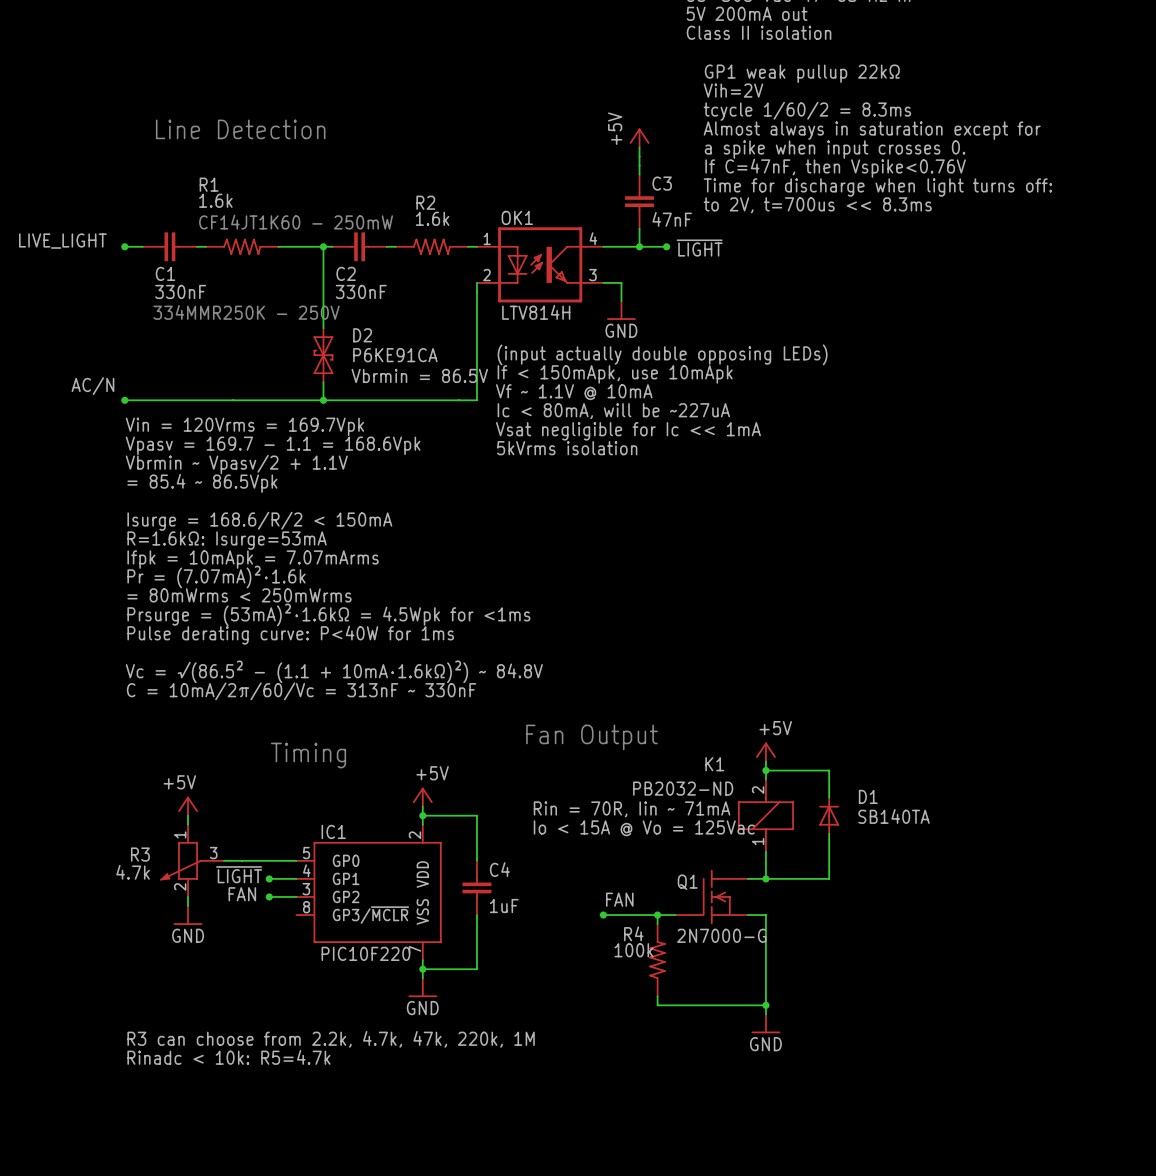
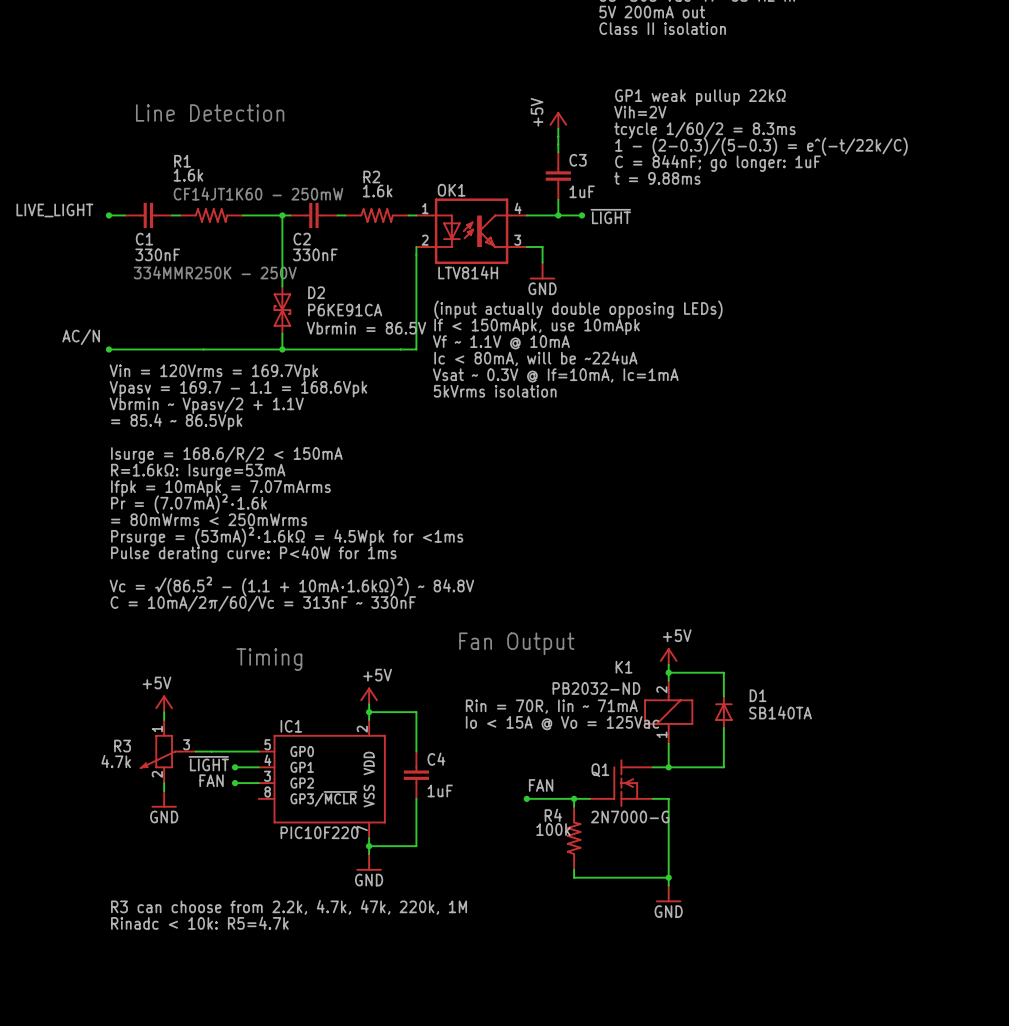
text: GP1 weak pullup 22kΩ (802, 73) -> none
text: Vih=2V (733, 90) -> none
text: tcycle 1/60/2 = 8.3ms (807, 111) -> GP1 weak pullup 22kΩ (700, 97)
text: Almost always in saturation except for (872, 130) -> Vih=2V (640, 112)
text: a spike when input crosses 0. (835, 149) -> tcycle 1/60/2 = 8.3ms (704, 130)
text: If C=47nF, then Vspike<0.76V (835, 168) -> 1 - (2-0.3)/(5-0.3) = e^(-t/22k/C) (761, 146)
text: Time for discharge when light turns off: (877, 187) -> C = 844nF; go longer: 1uF (717, 163)
text: to 2V, t=700us << 8.3ms (817, 205) -> t = 9.88ms (657, 178)
C3 value: 47nF (672, 219) -> 1uF (582, 191)
text: Ic < 80mA, will be ~227uA (613, 411) -> Ic < 80mA, will be ~224uA (535, 358)
text: Vsat negligible for Ic << 1mA (628, 431) -> Vsat ~ 0.3V @ If=10mA, Ic=1mA (555, 375)

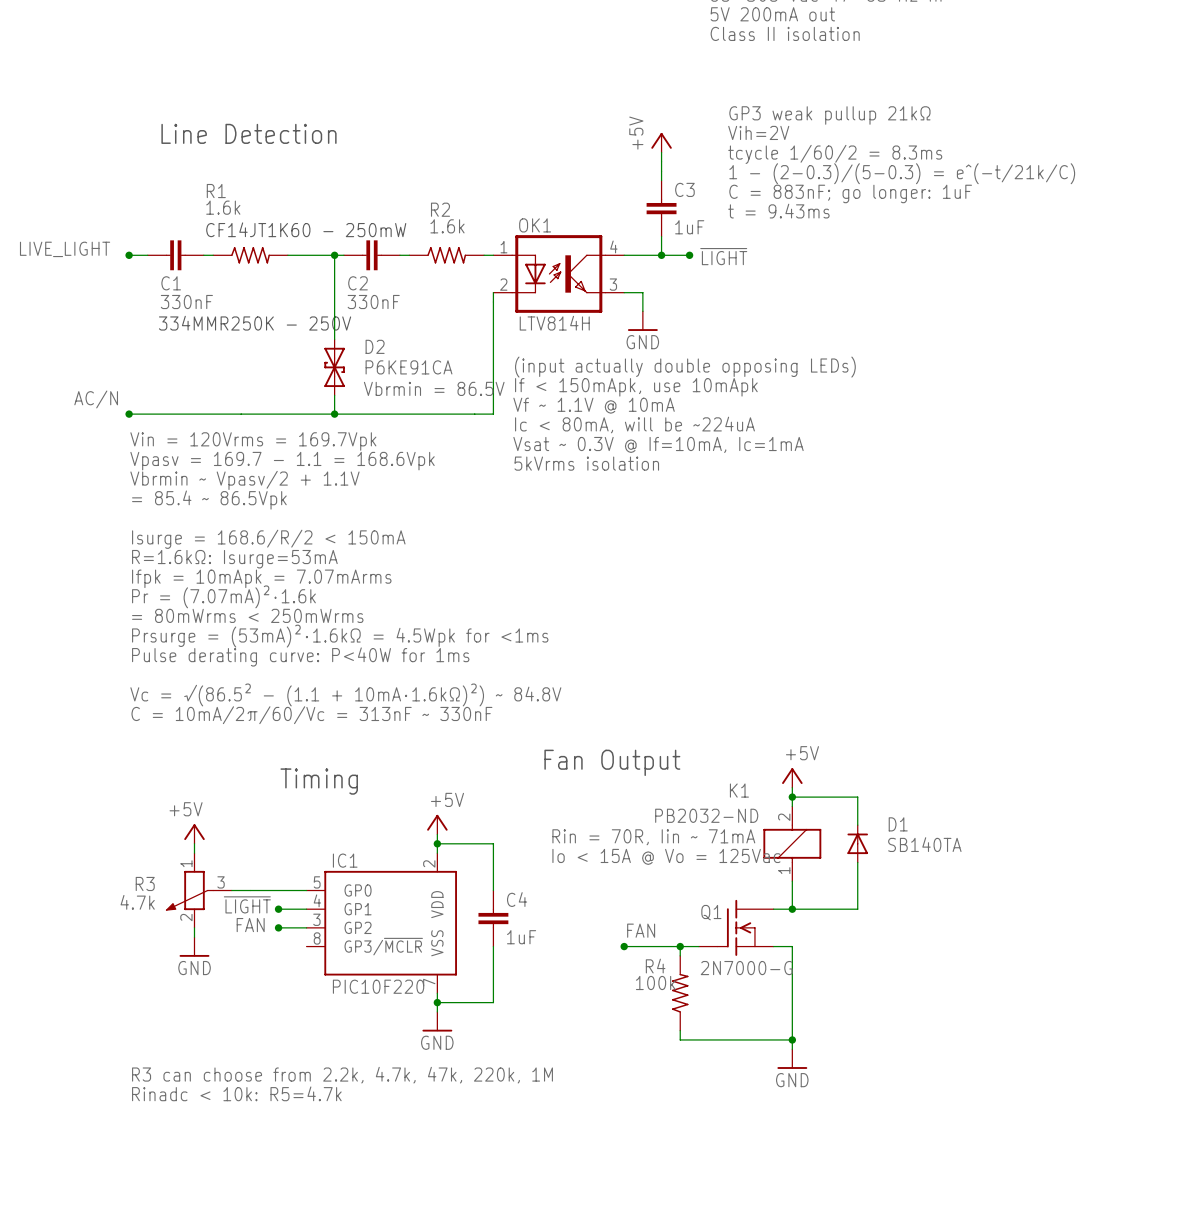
text: GP1 weak pullup 22kΩ (700, 97) -> GP3 weak pullup 21kΩ (829, 115)
text: 1 - (2-0.3)/(5-0.3) = e^(-t/22k/C) (761, 146) -> 1 - (2-0.3)/(5-0.3) = e^(-t/21k/C) (902, 173)
text: C = 844nF; go longer: 1uF (717, 163) -> C = 883nF; go longer: 1uF (850, 193)
text: t = 9.88ms (657, 178) -> t = 9.43ms (778, 211)

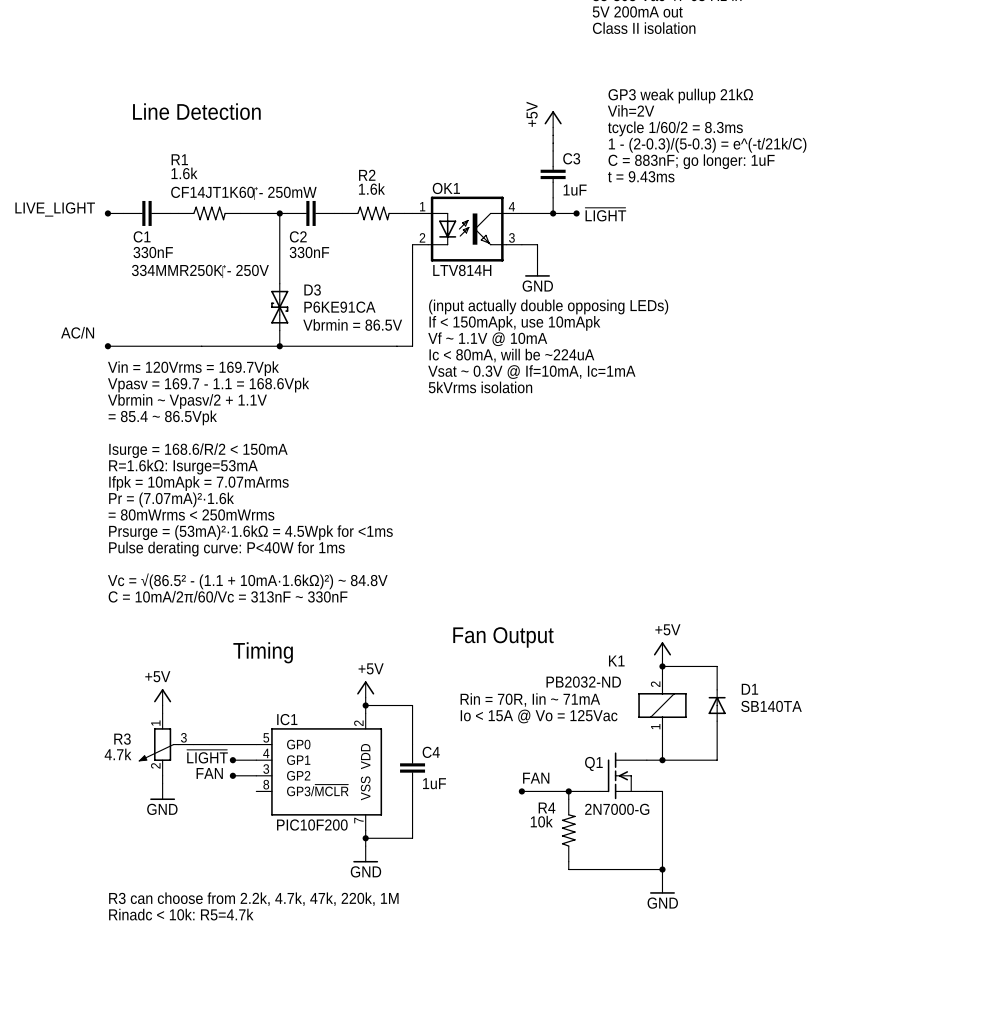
D2 name: D2 (375, 346) -> D3 (312, 290)
R4 value: 100k (655, 982) -> 10k (541, 821)
IC1 value: PIC10F220 (378, 986) -> PIC10F200 (312, 825)

